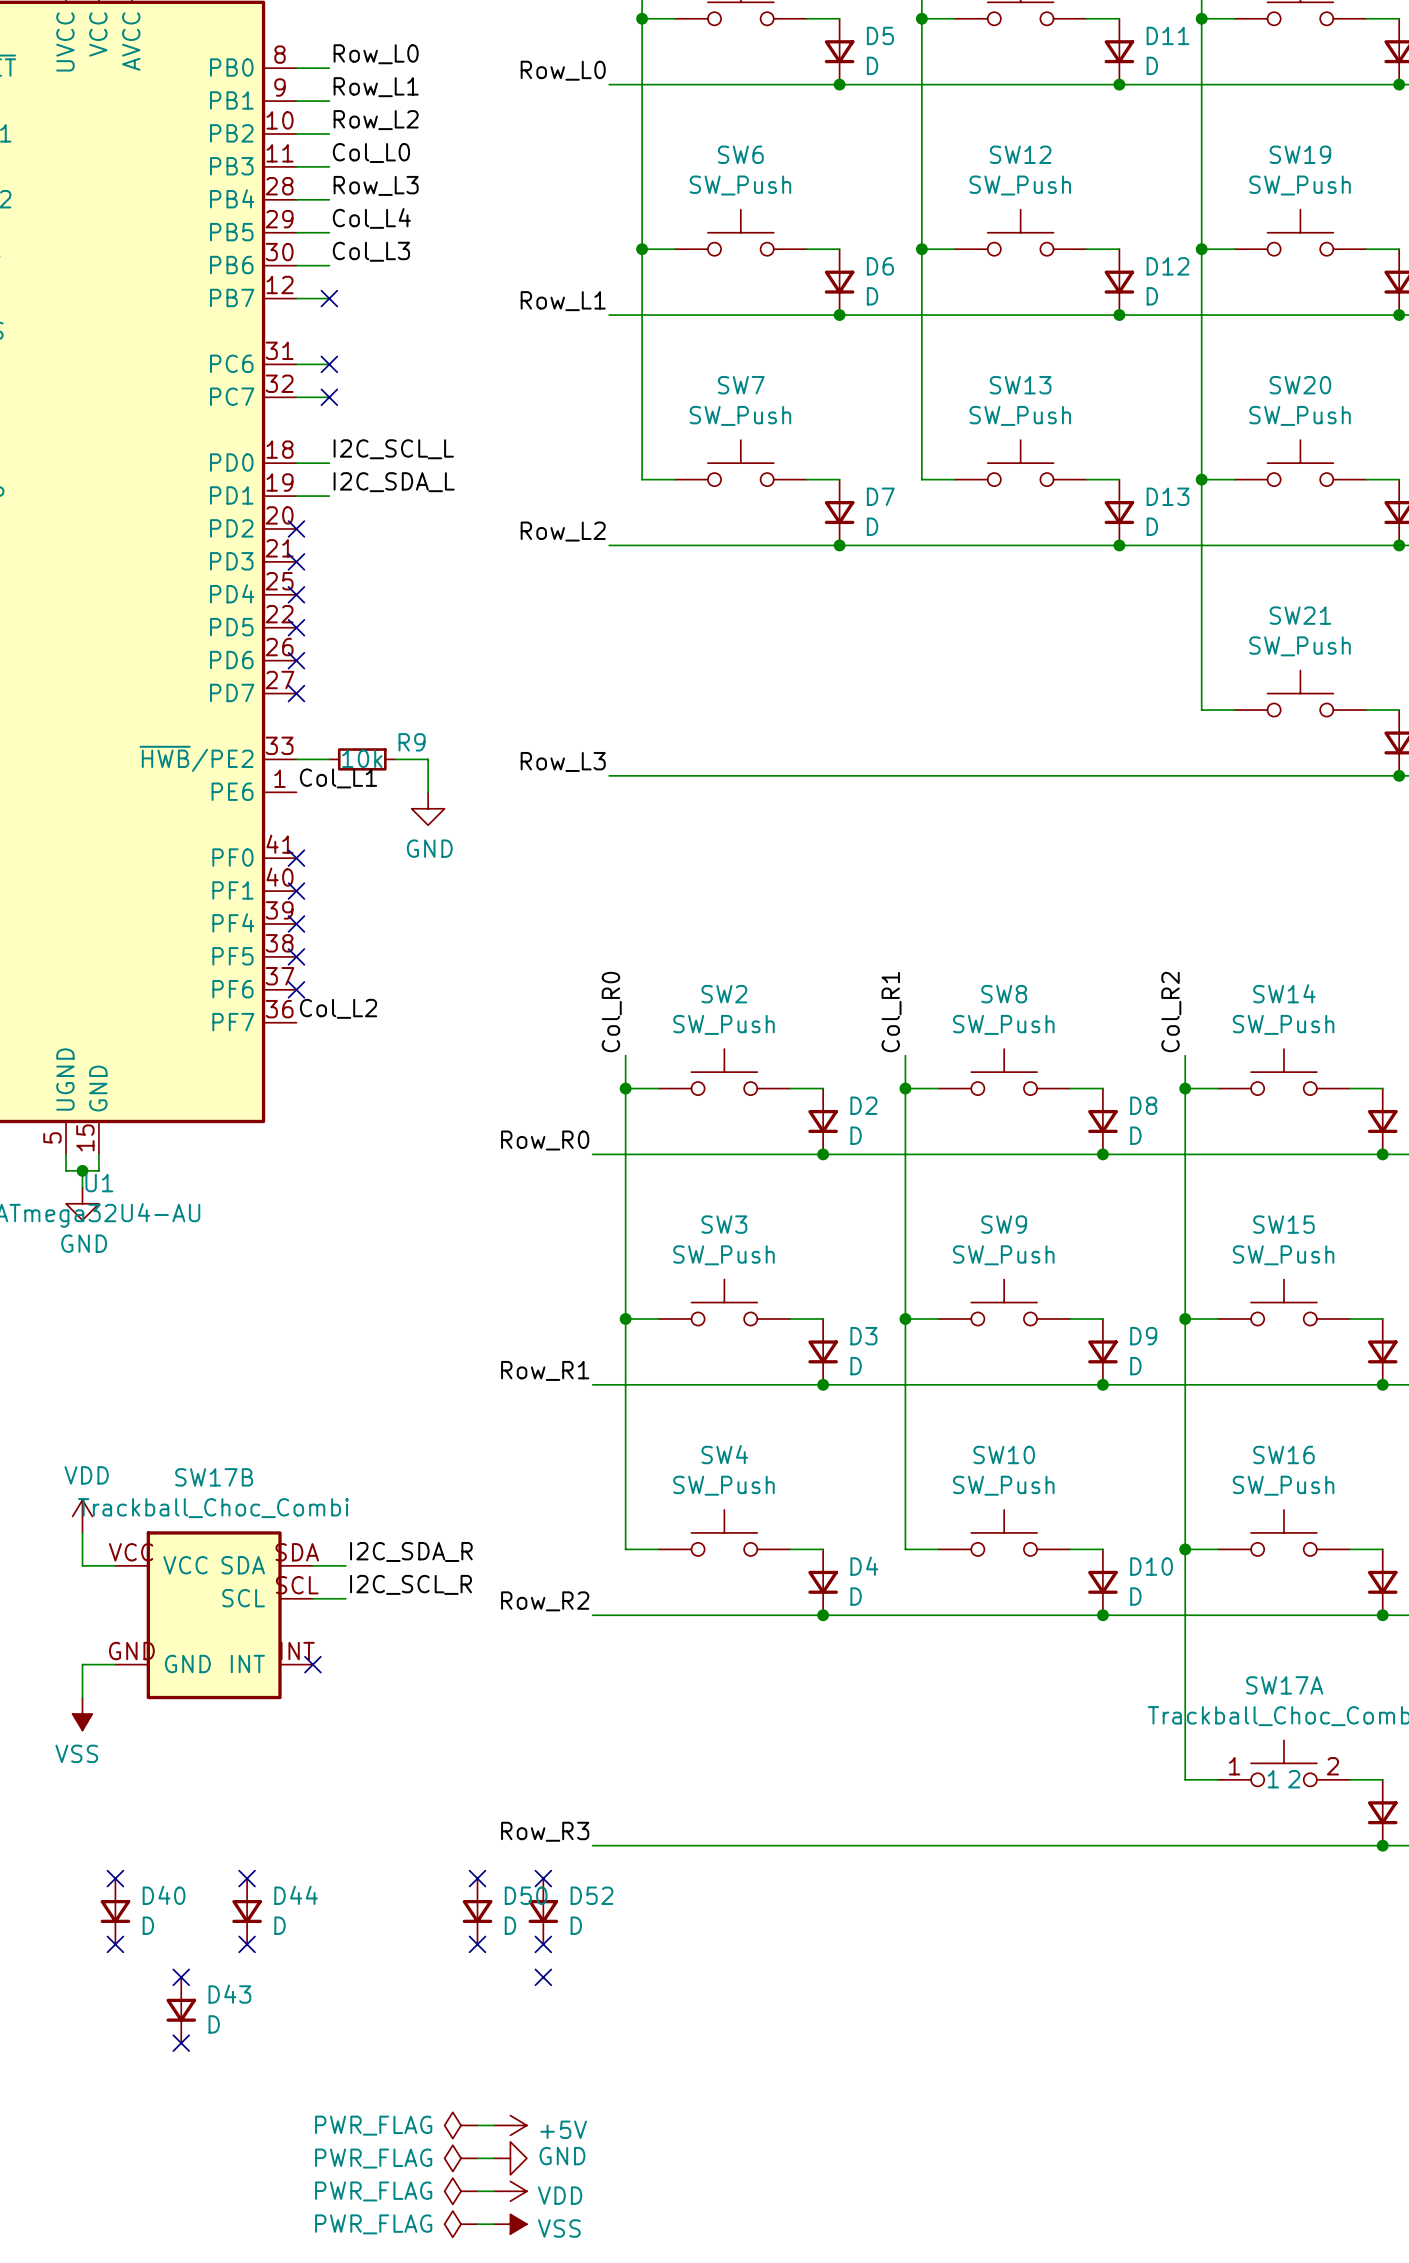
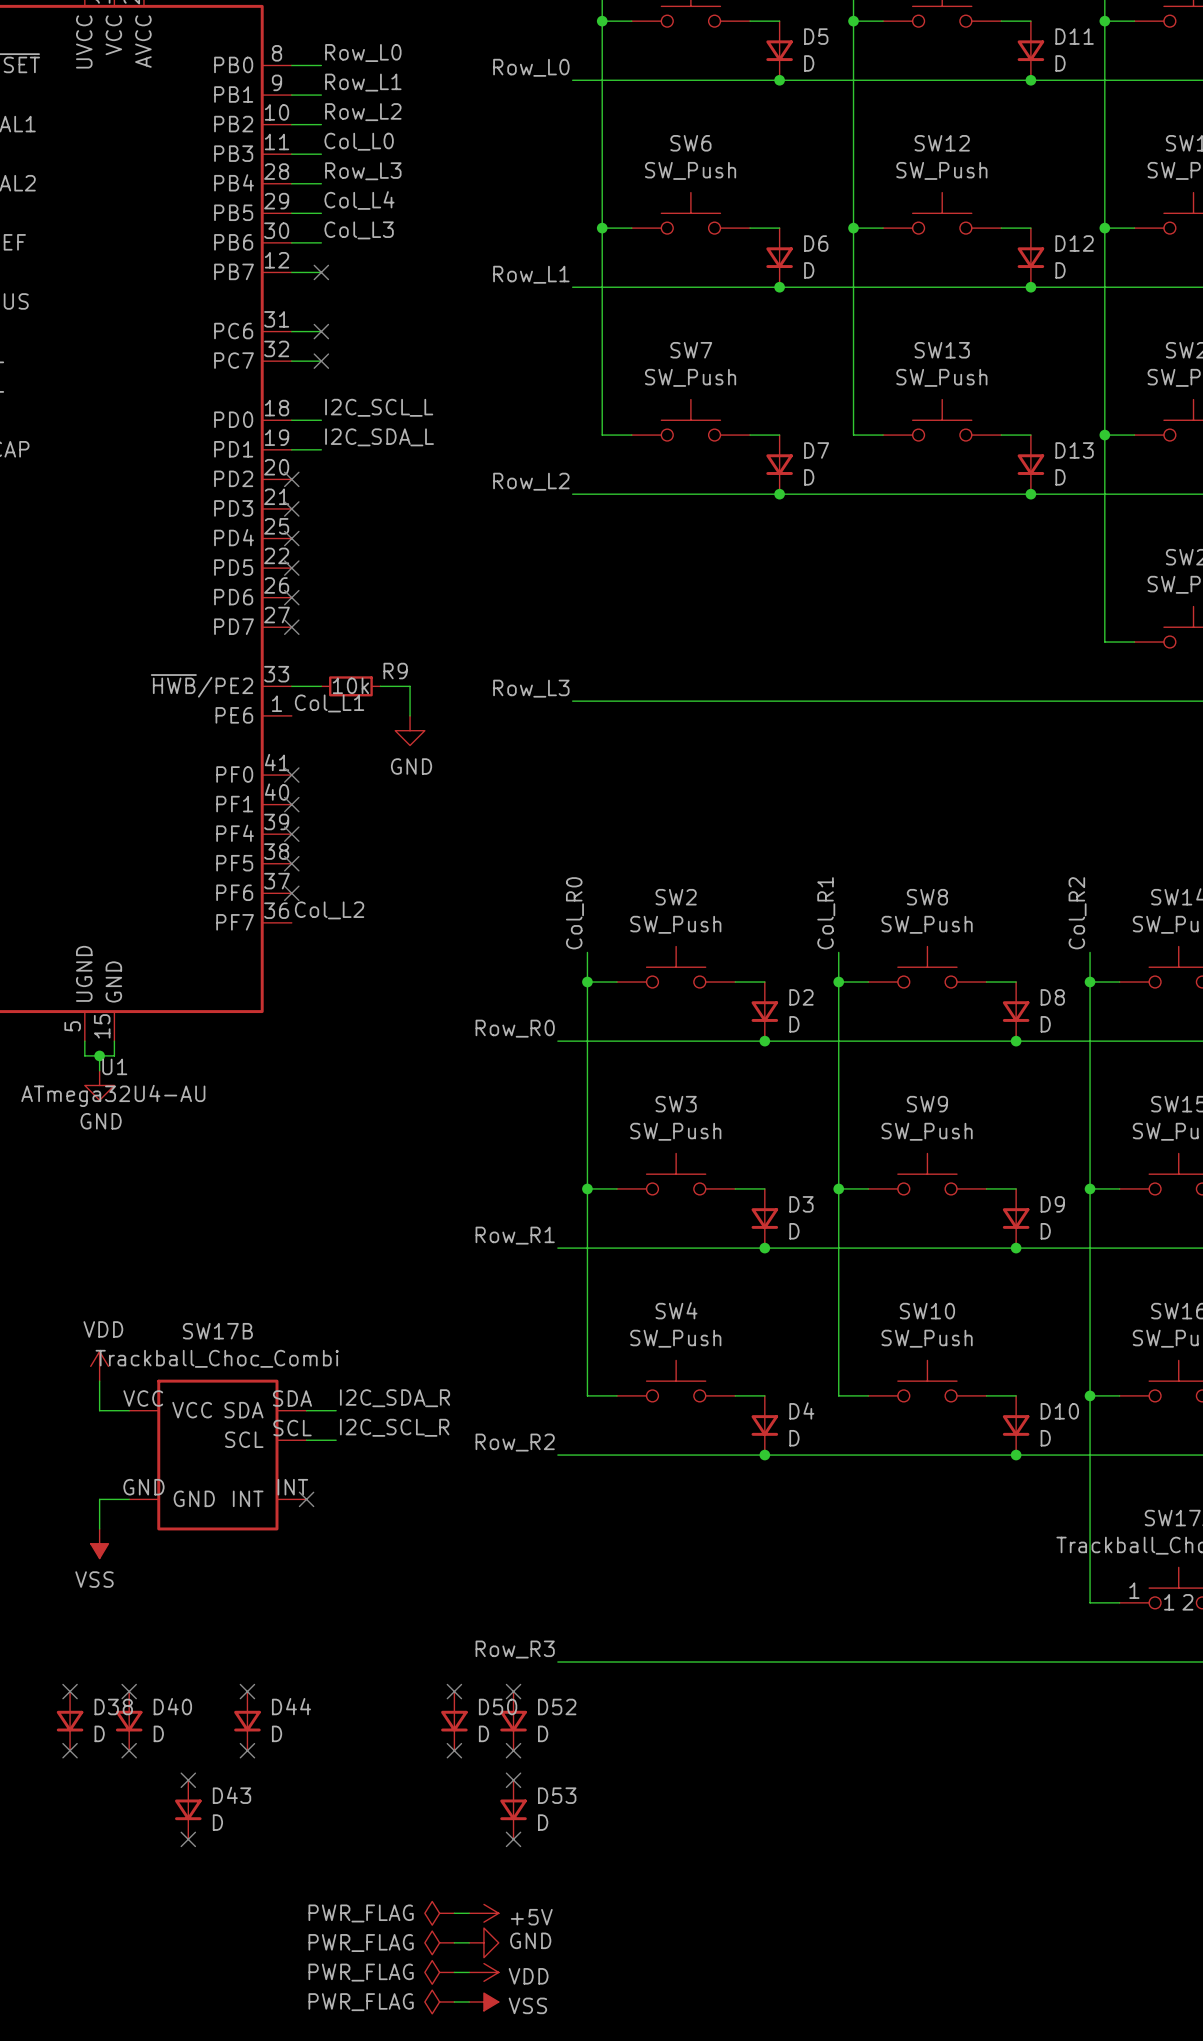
no-connect mark: none -> (70, 1691)
D38: none -> D (70, 1721)
no-connect mark: none -> (70, 1750)
D53: none -> D (513, 1809)
no-connect mark: none -> (513, 1839)

